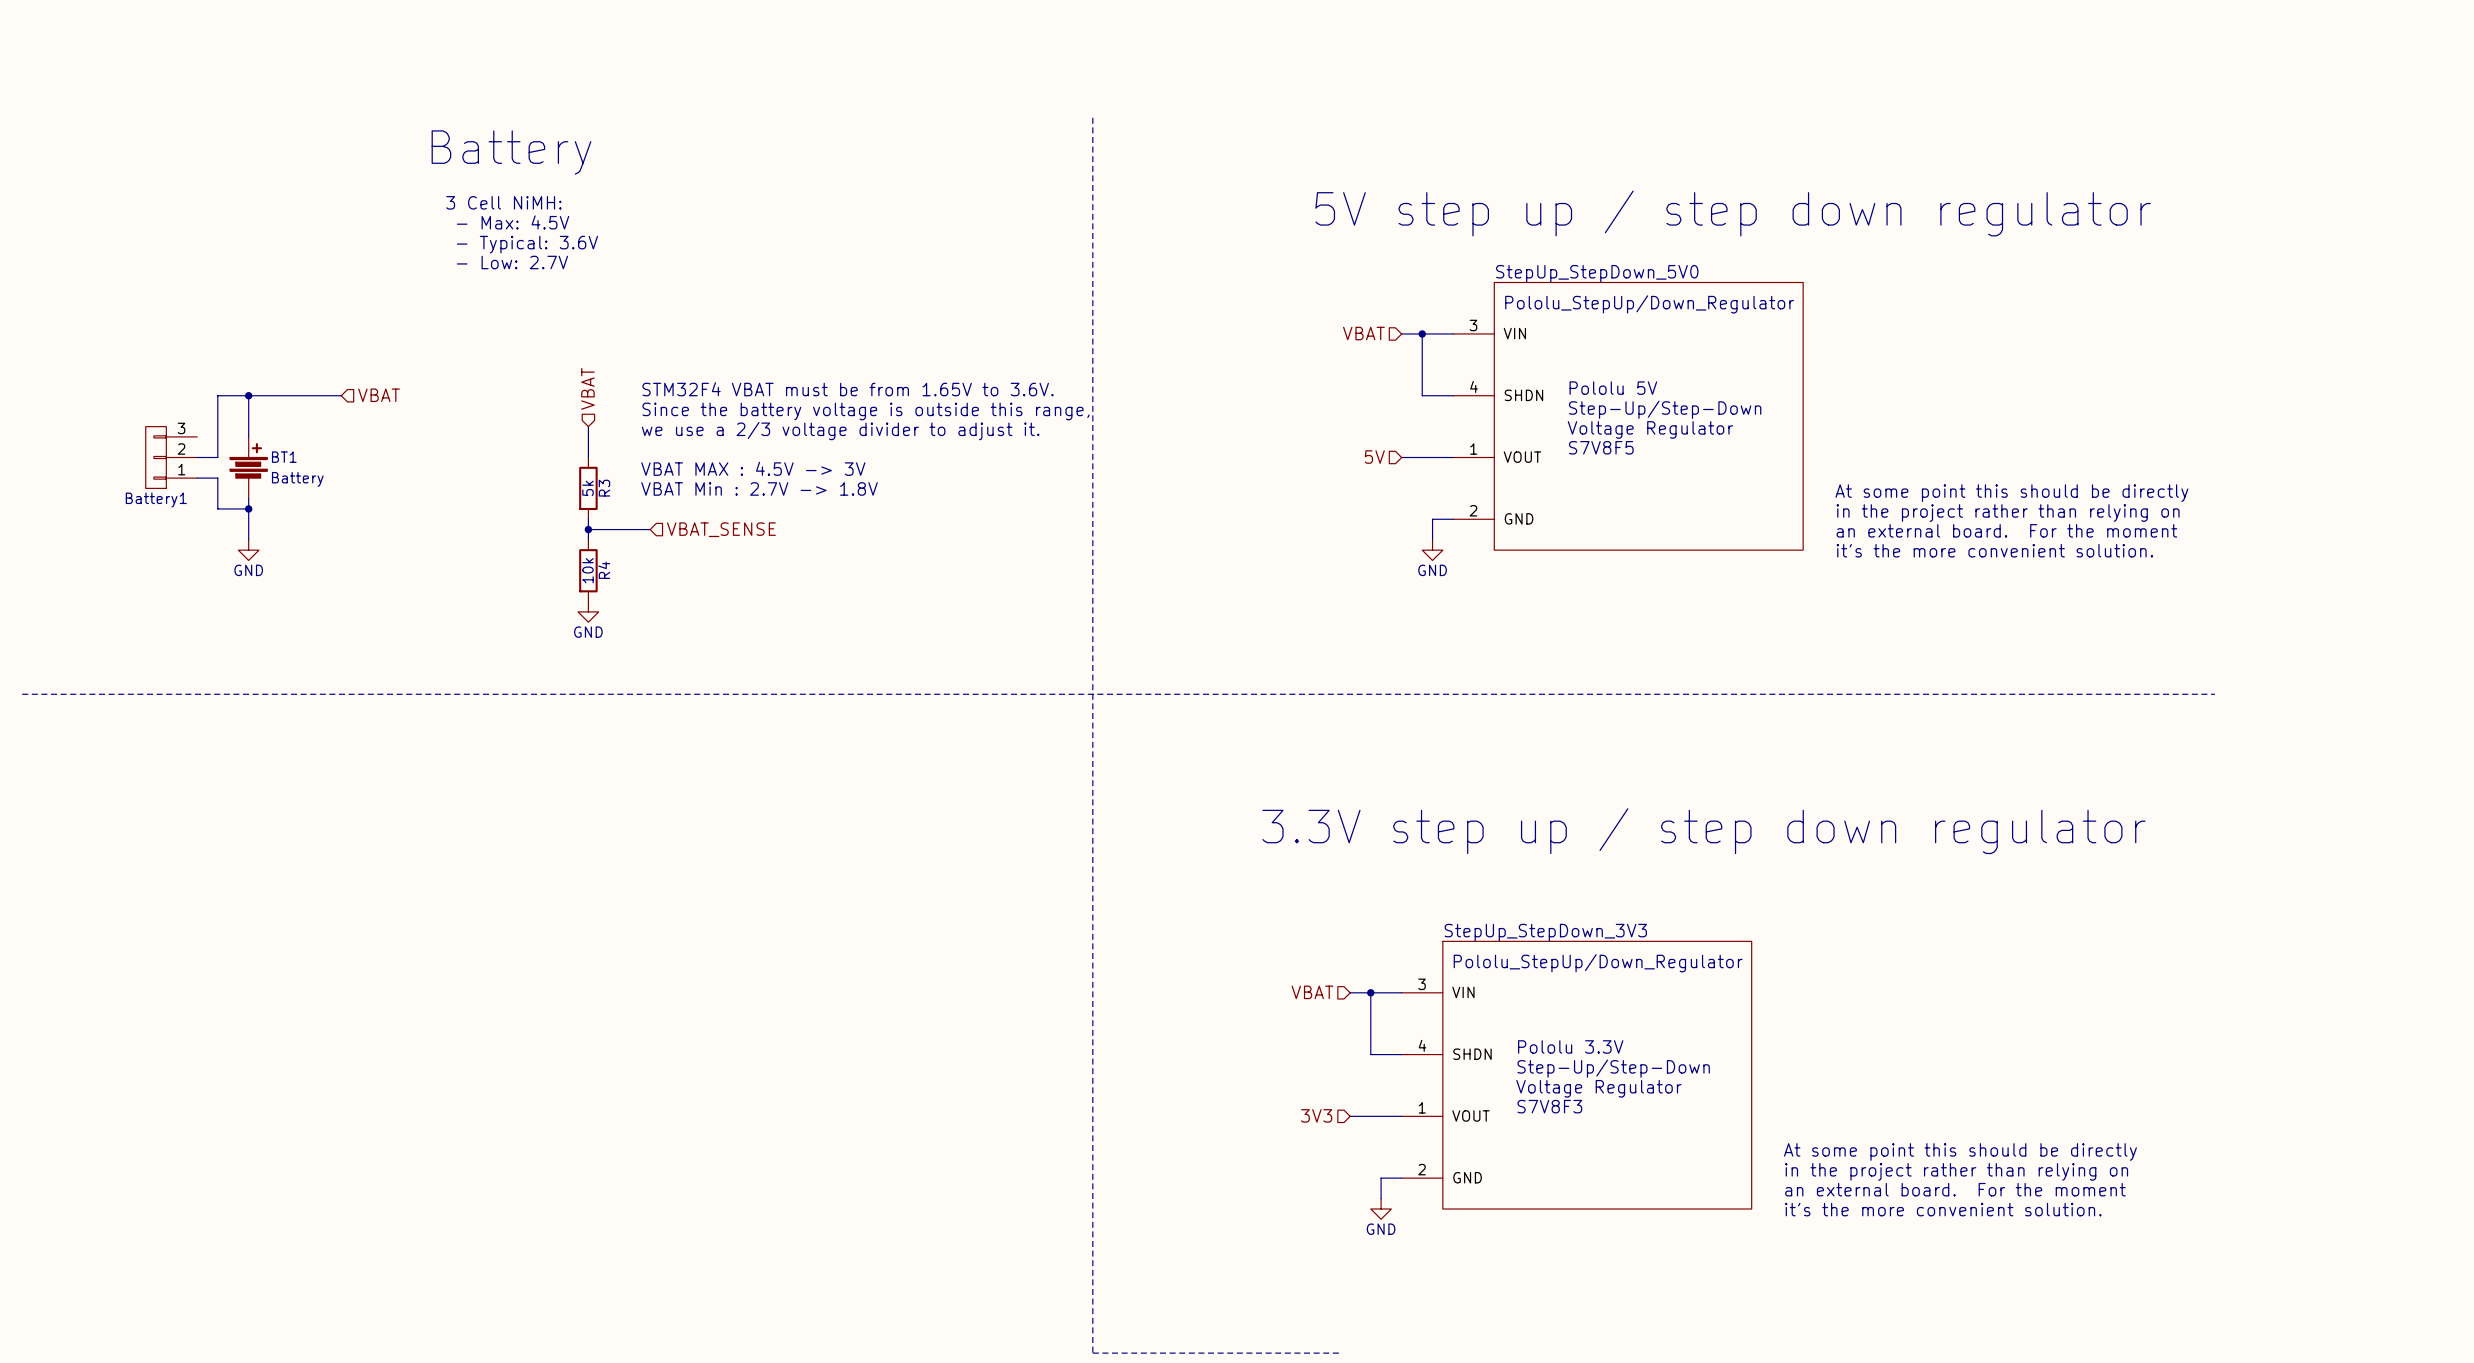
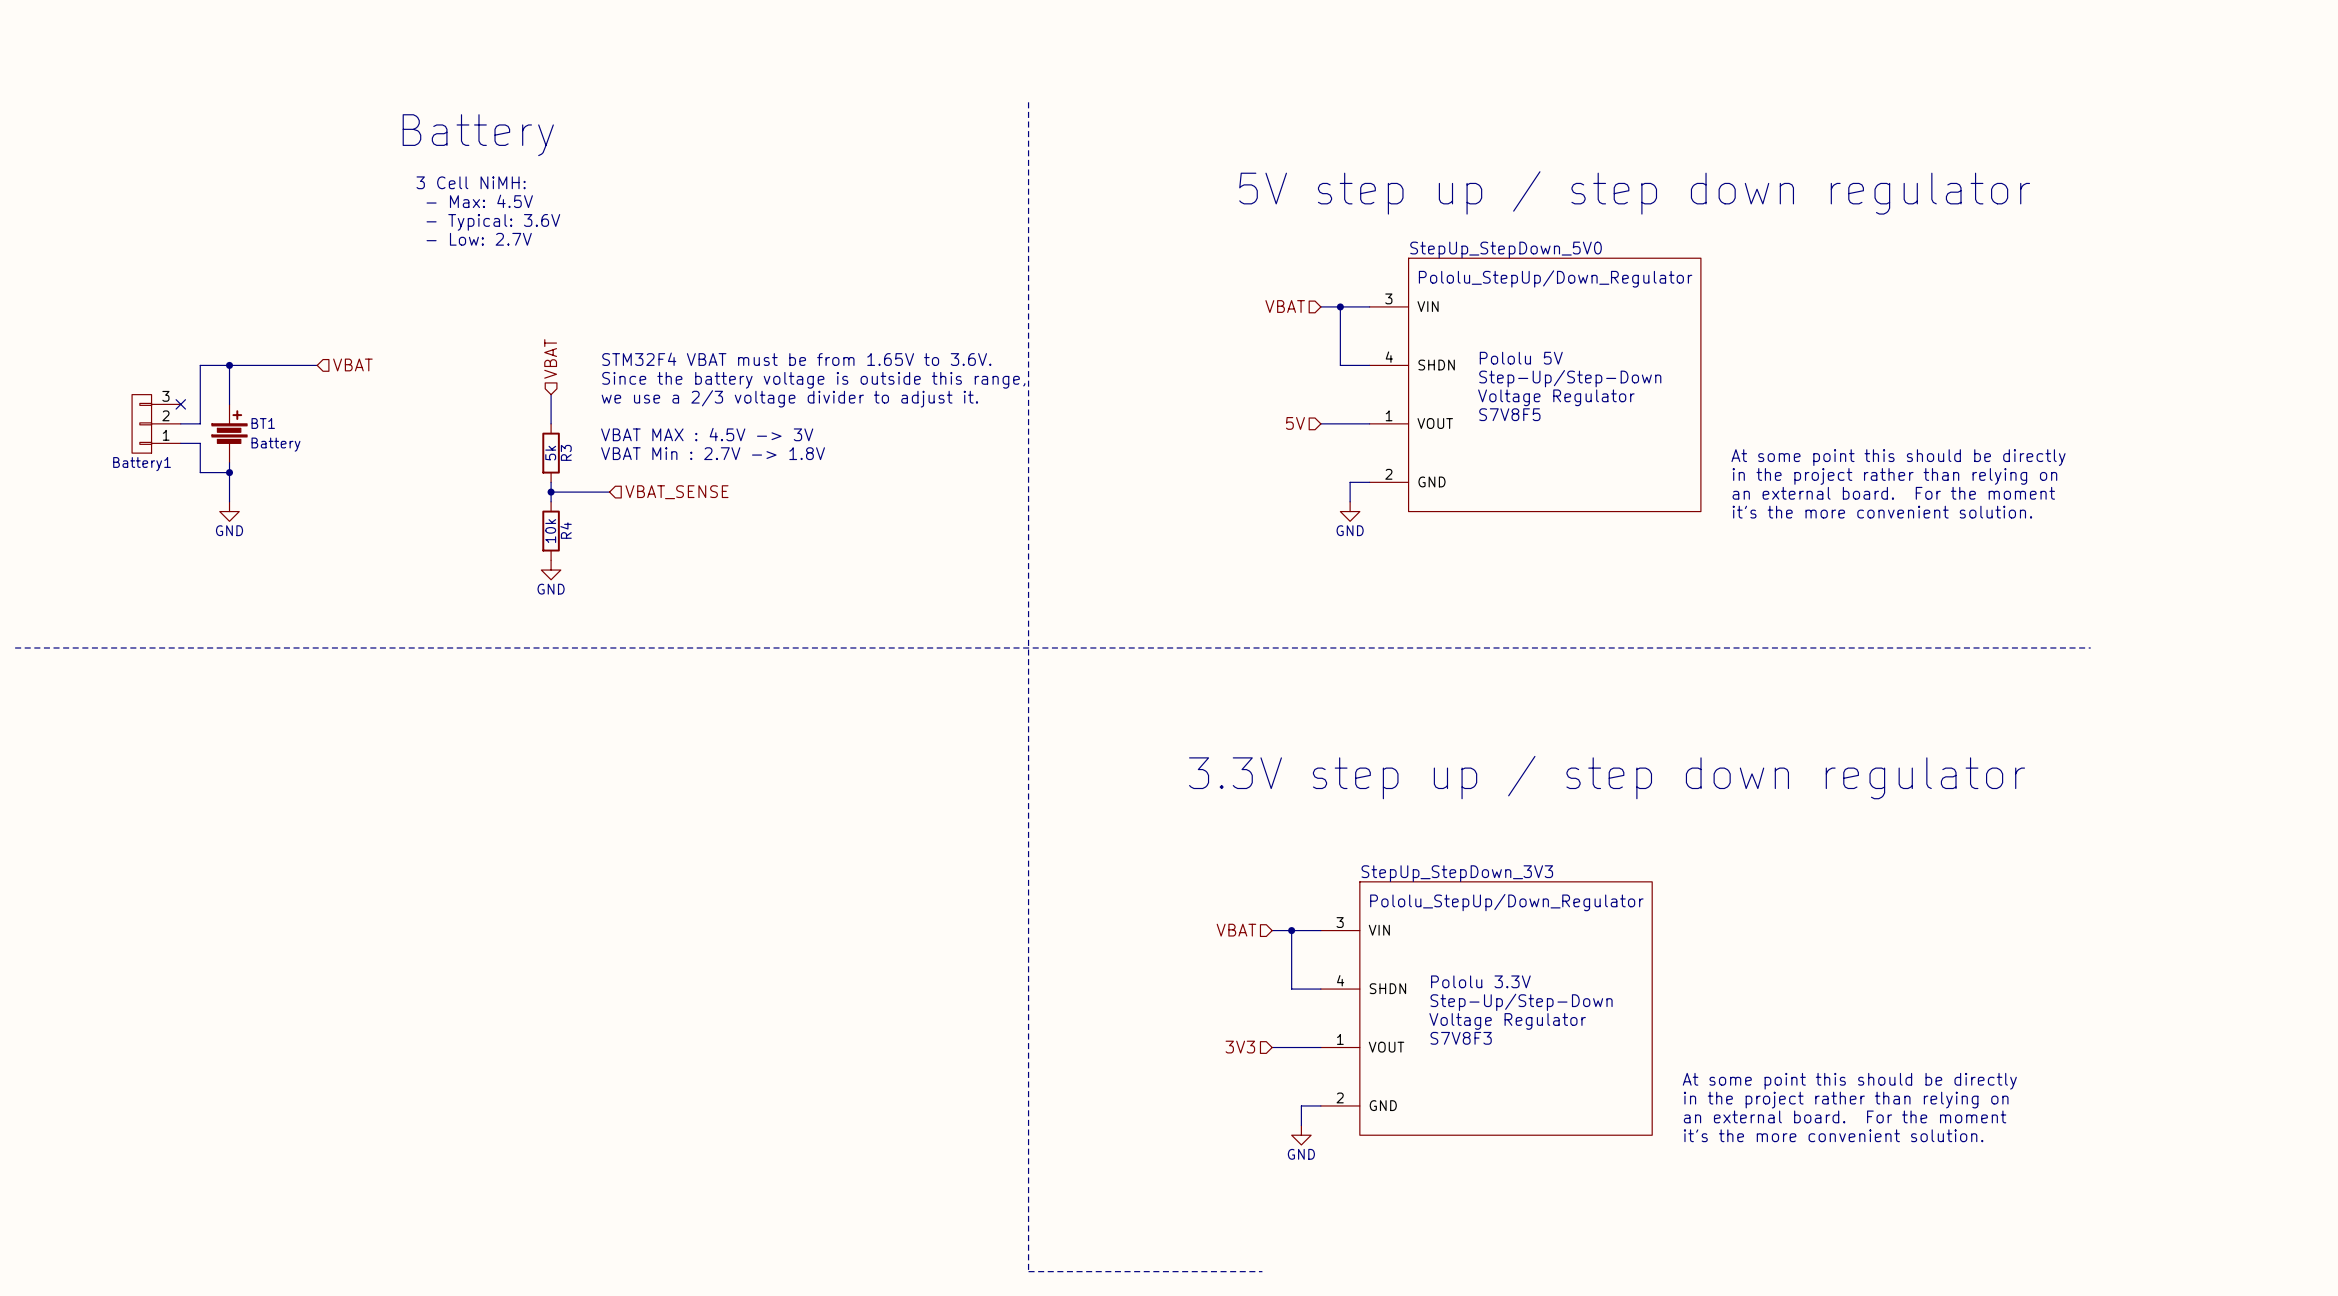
no-connect mark: none -> (180, 404)

